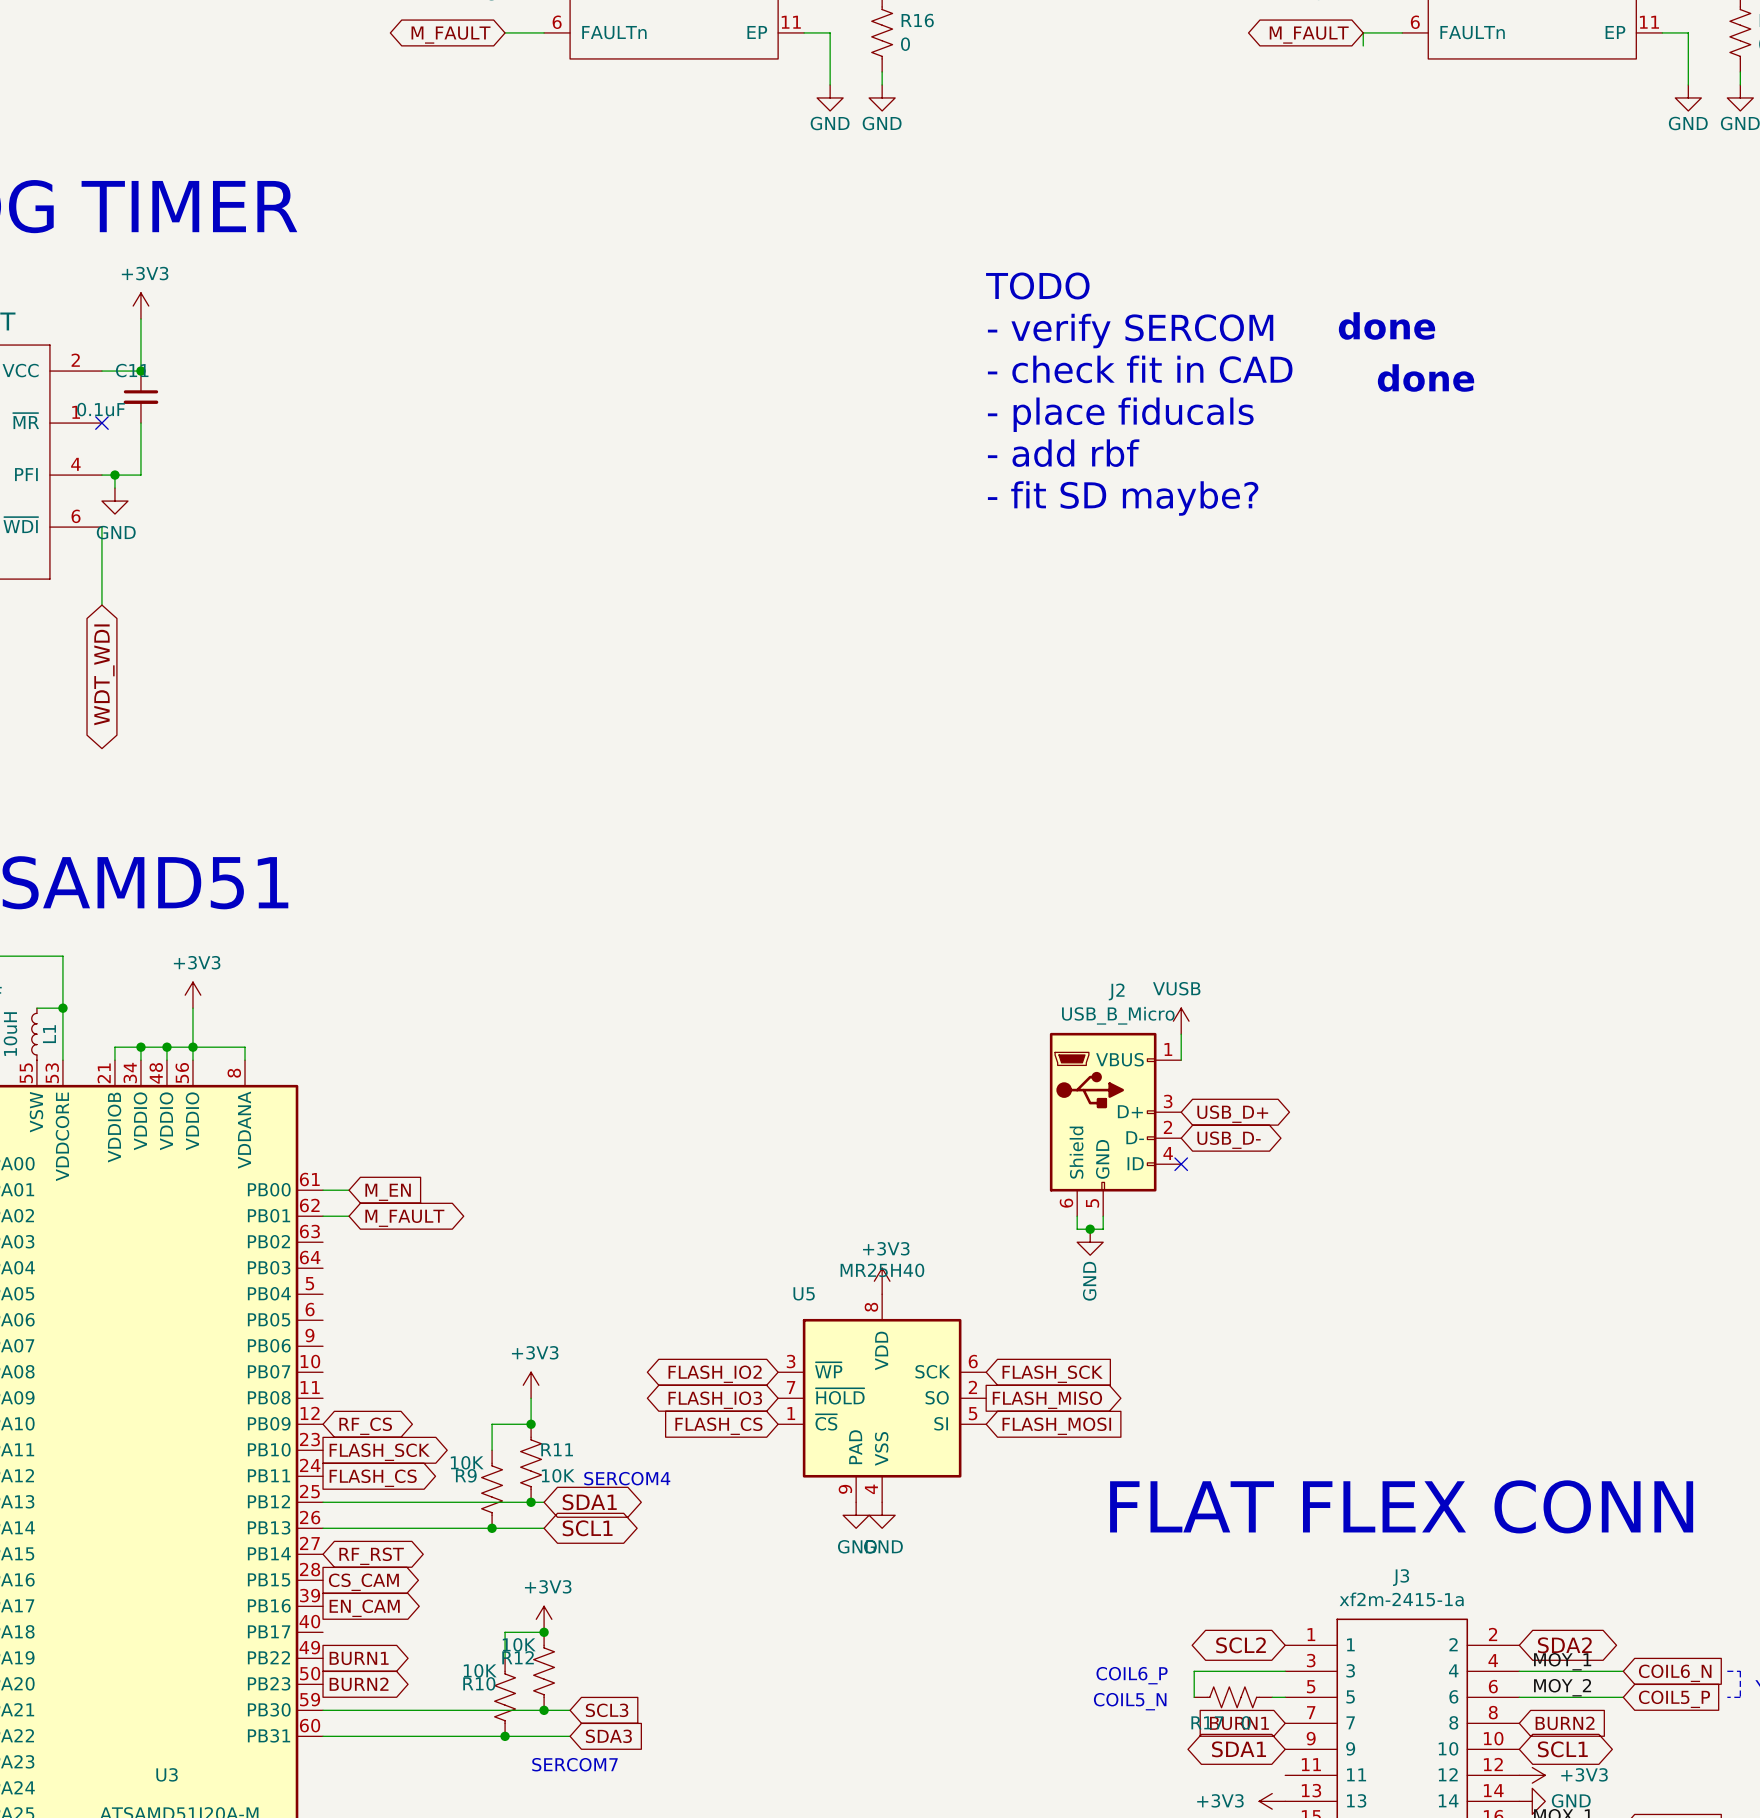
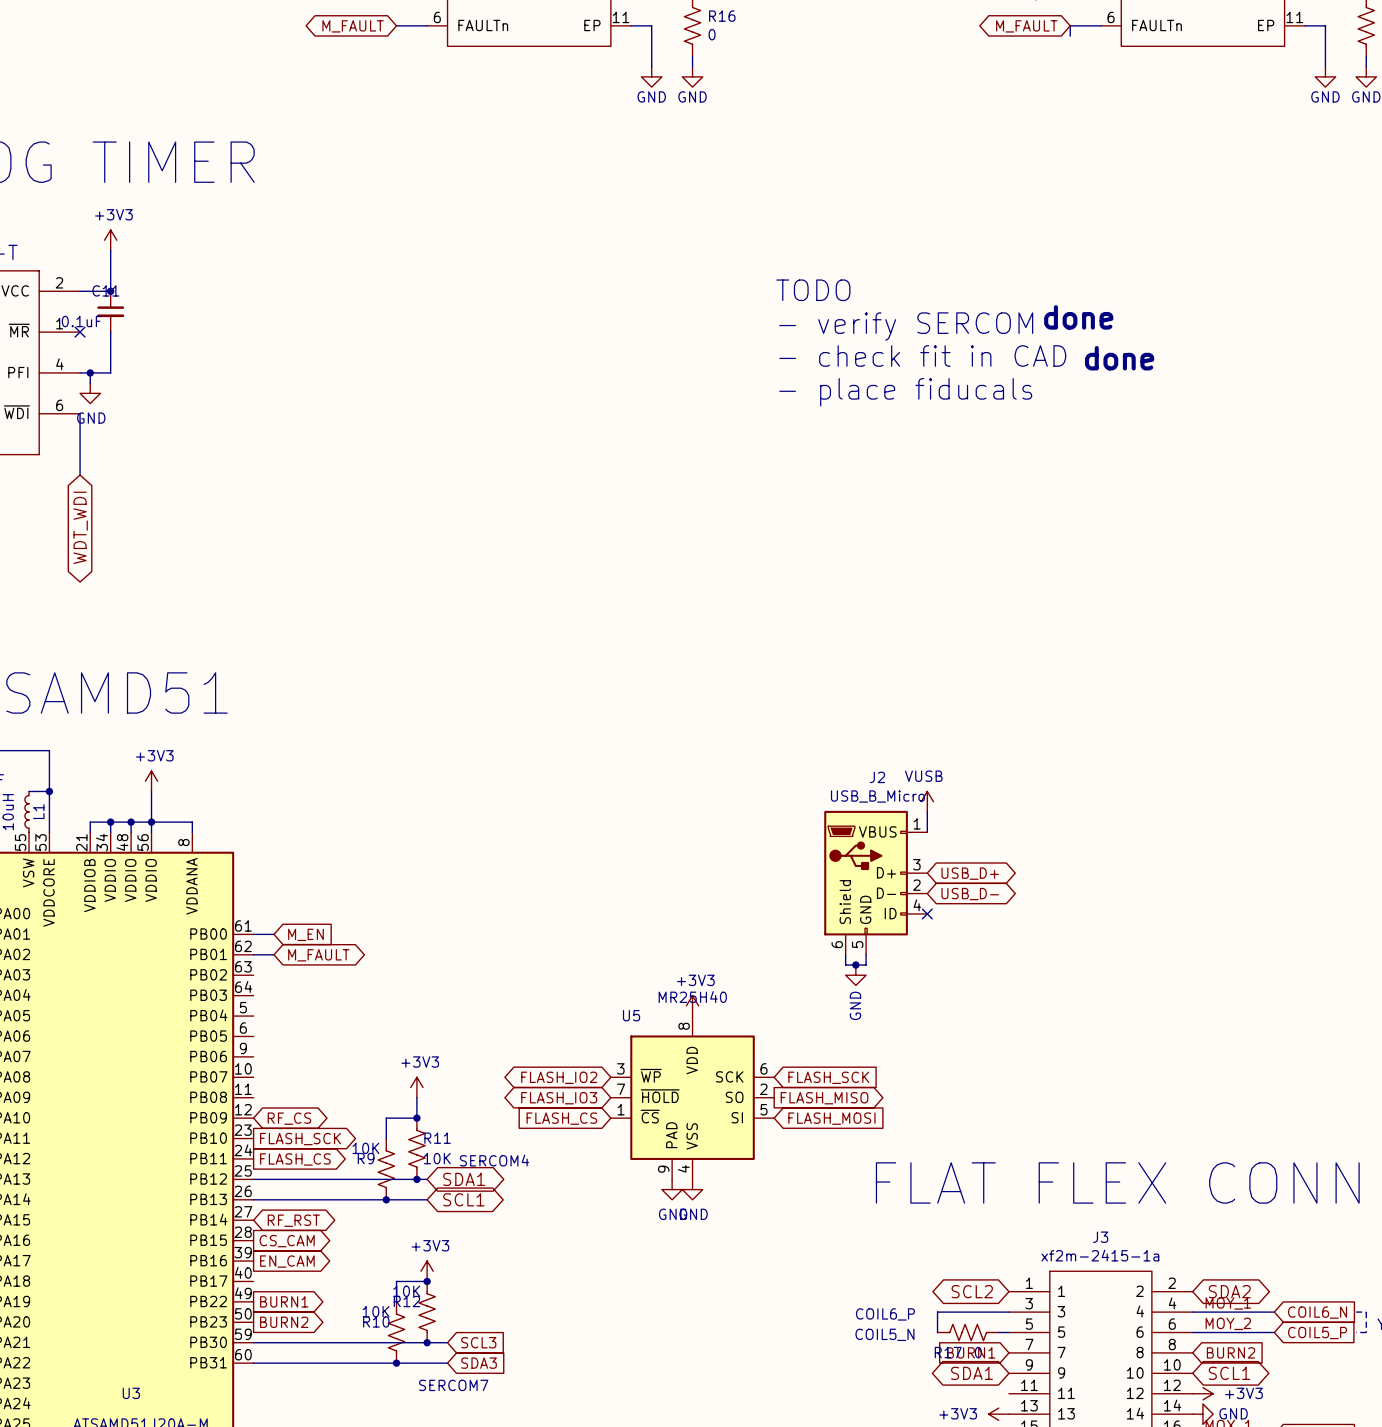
text: TODO (1037, 285) -> none
text: done (1386, 325) -> none
text: - verify SERCOM (1130, 331) -> none
text: - check fit in CAD (1140, 369) -> TODO (813, 290)
text position: done (1426, 378) -> done (1078, 317)
text: - place fiducals (1120, 414) -> - verify SERCOM (906, 326)
text: - add rbf (1063, 453) -> - check fit in CAD (922, 355)
text: none -> done (1119, 358)
text: - fit SD maybe? (1123, 498) -> - place fiducals (905, 392)

